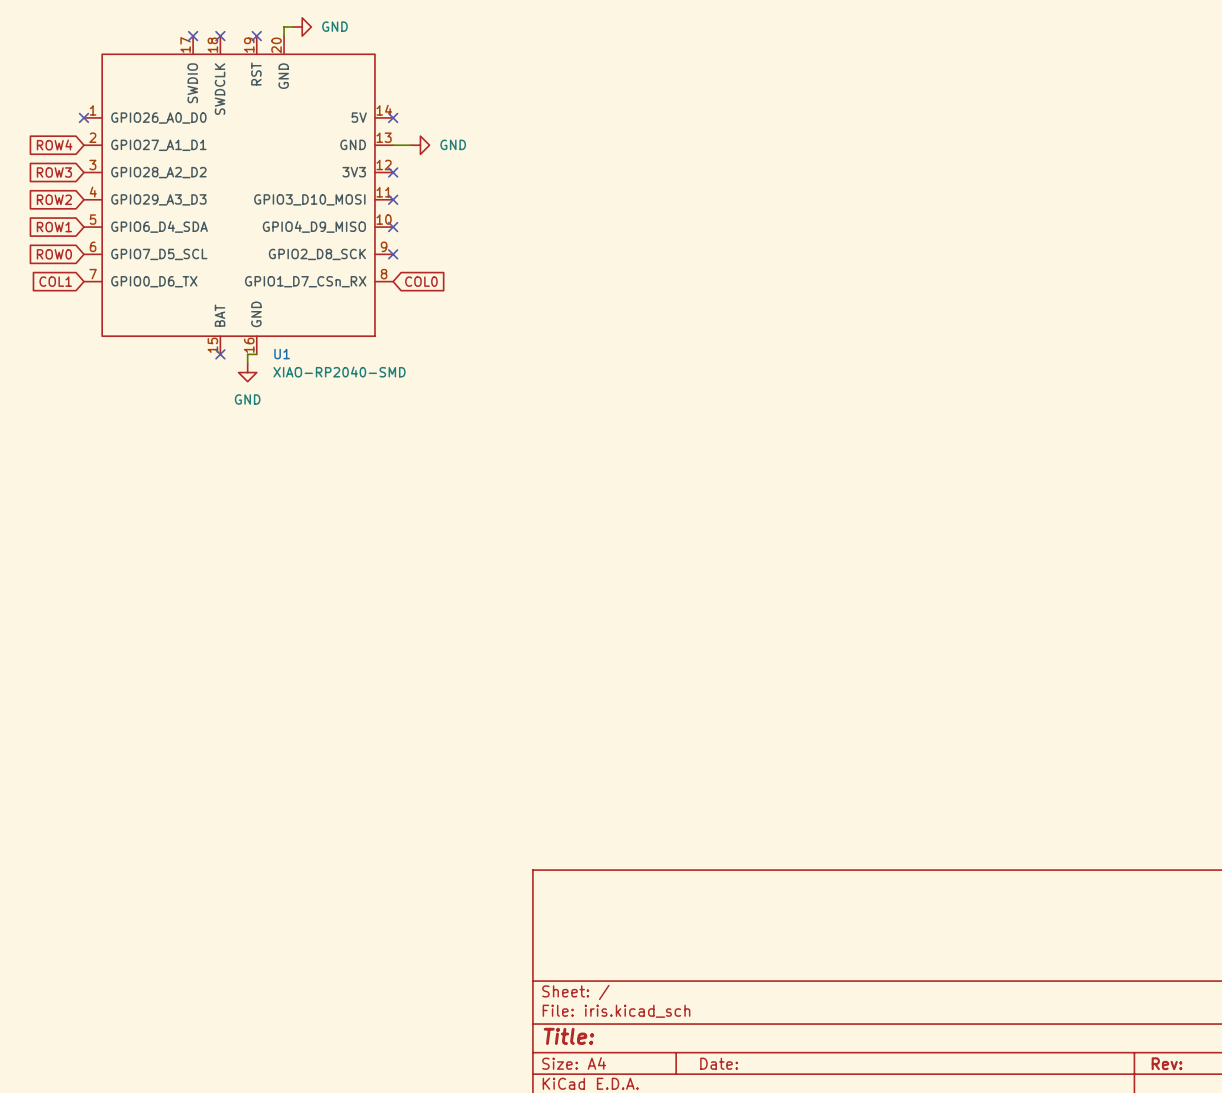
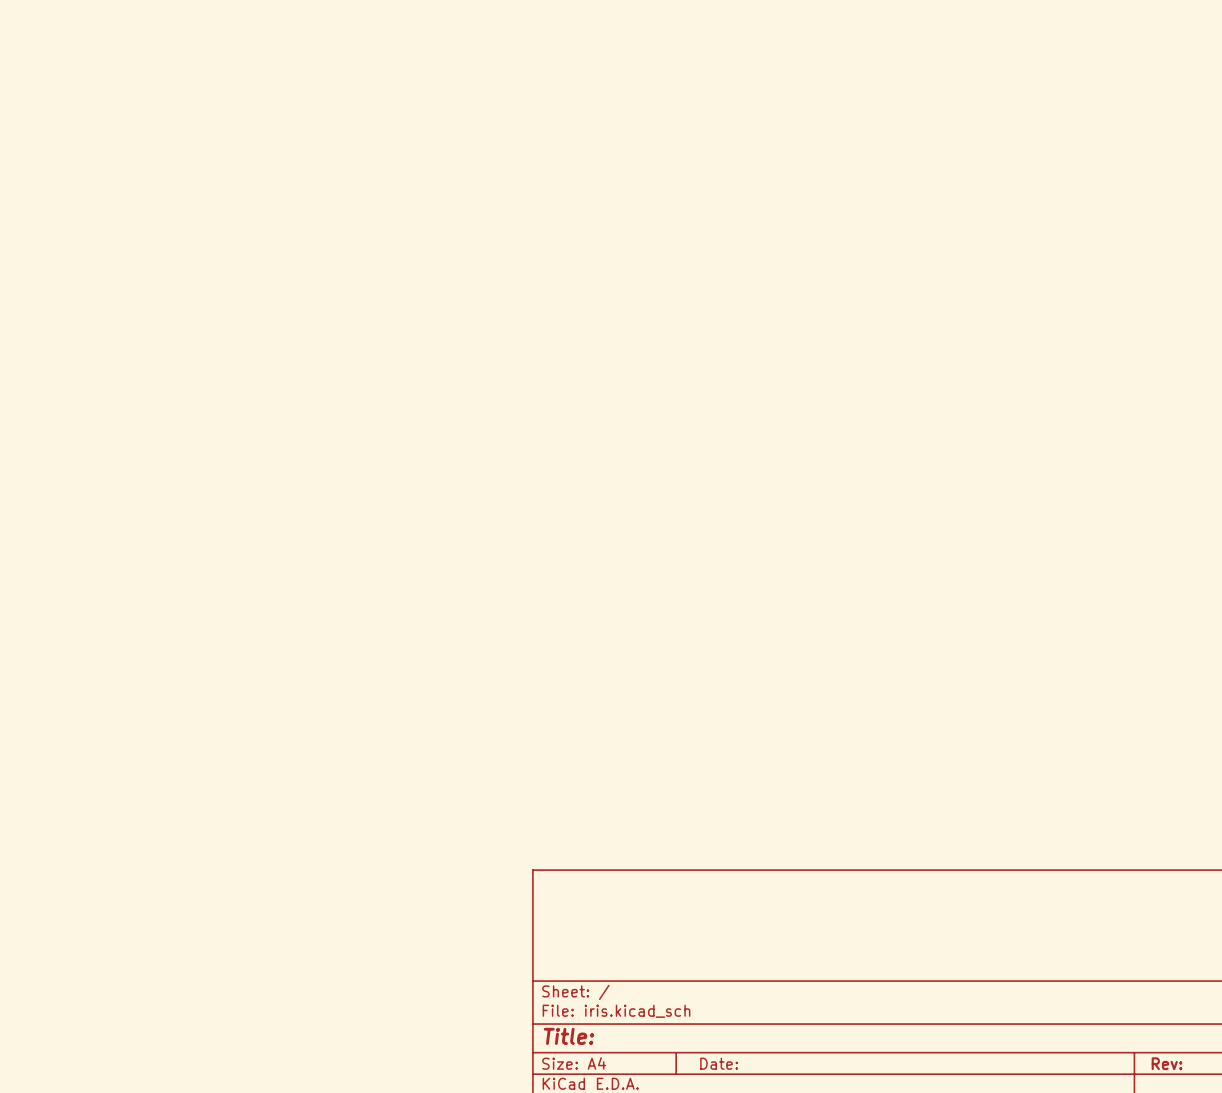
wire: (293, 27) (284, 27) (284, 36) -> none
power symbol: GND (302, 27) -> none
no-connect mark: (193, 36) -> none
no-connect mark: (220, 36) -> none
no-connect mark: (256, 36) -> none
no-connect mark: (83, 117) -> none
no-connect mark: (393, 117) -> none
global label: ROW4 (54, 145) -> none
wire: (393, 145) (411, 145) -> none
power symbol: GND (420, 145) -> none
global label: ROW3 (54, 172) -> none
no-connect mark: (393, 172) -> none
U1: XIAO-RP2040-SMD (238, 195) -> none
global label: ROW2 (54, 199) -> none
no-connect mark: (393, 199) -> none
global label: ROW1 (54, 227) -> none
no-connect mark: (393, 227) -> none
global label: ROW0 (54, 254) -> none
no-connect mark: (393, 254) -> none
global label: COL1 (55, 281) -> none
global label: COL0 (421, 281) -> none
no-connect mark: (220, 354) -> none
wire: (256, 354) (247, 354) (247, 363) -> none
power symbol: GND (247, 372) -> none

